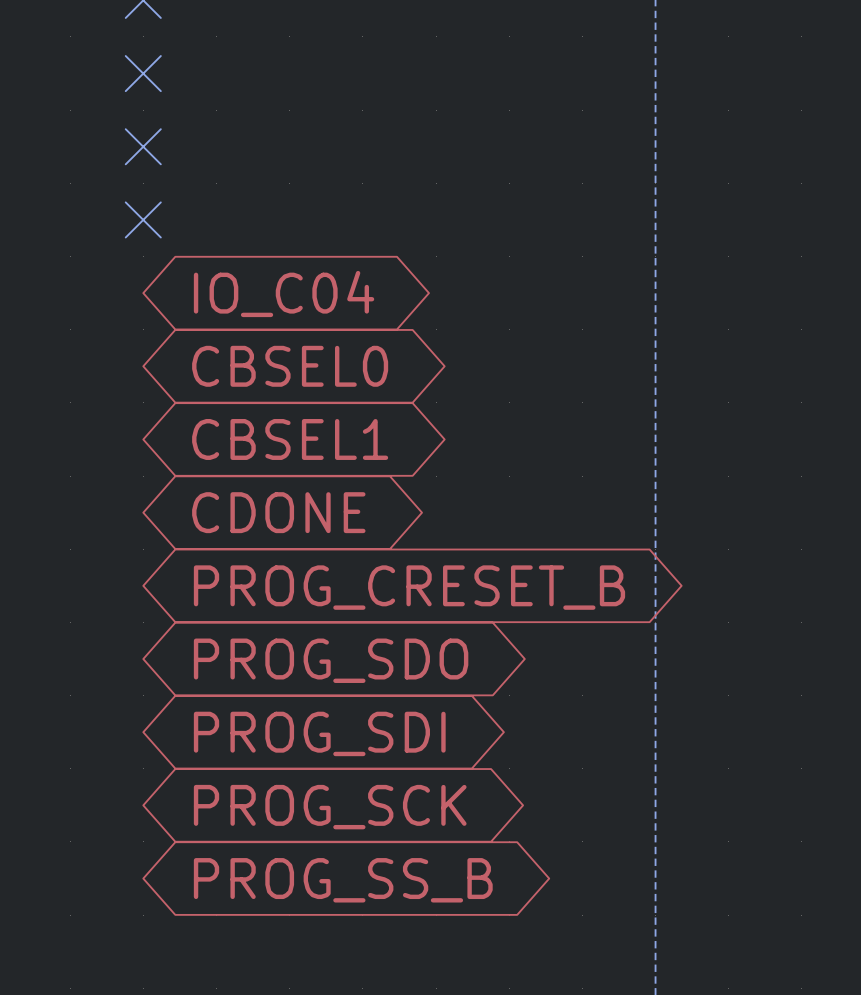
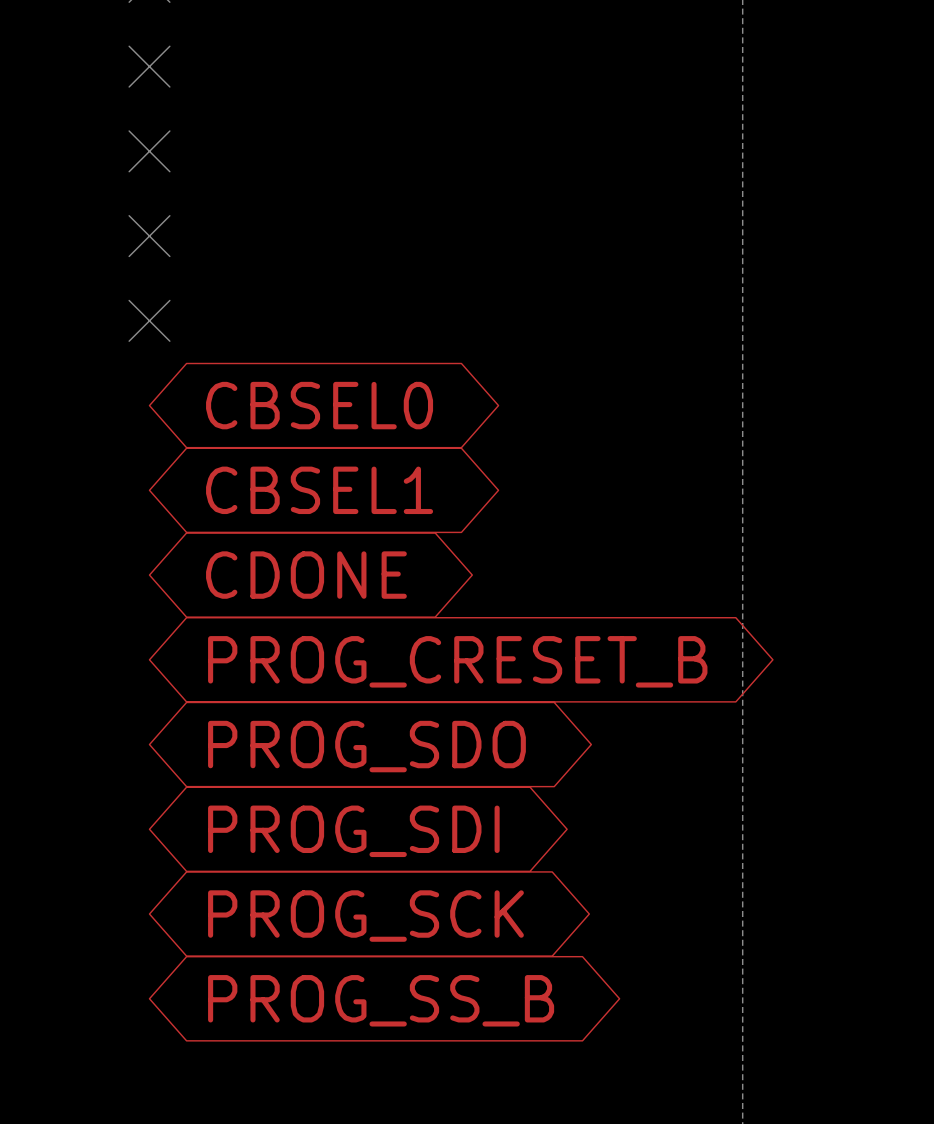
no-connect mark: none -> (149, 320)
global label: IO_C04 (284, 293) -> none

